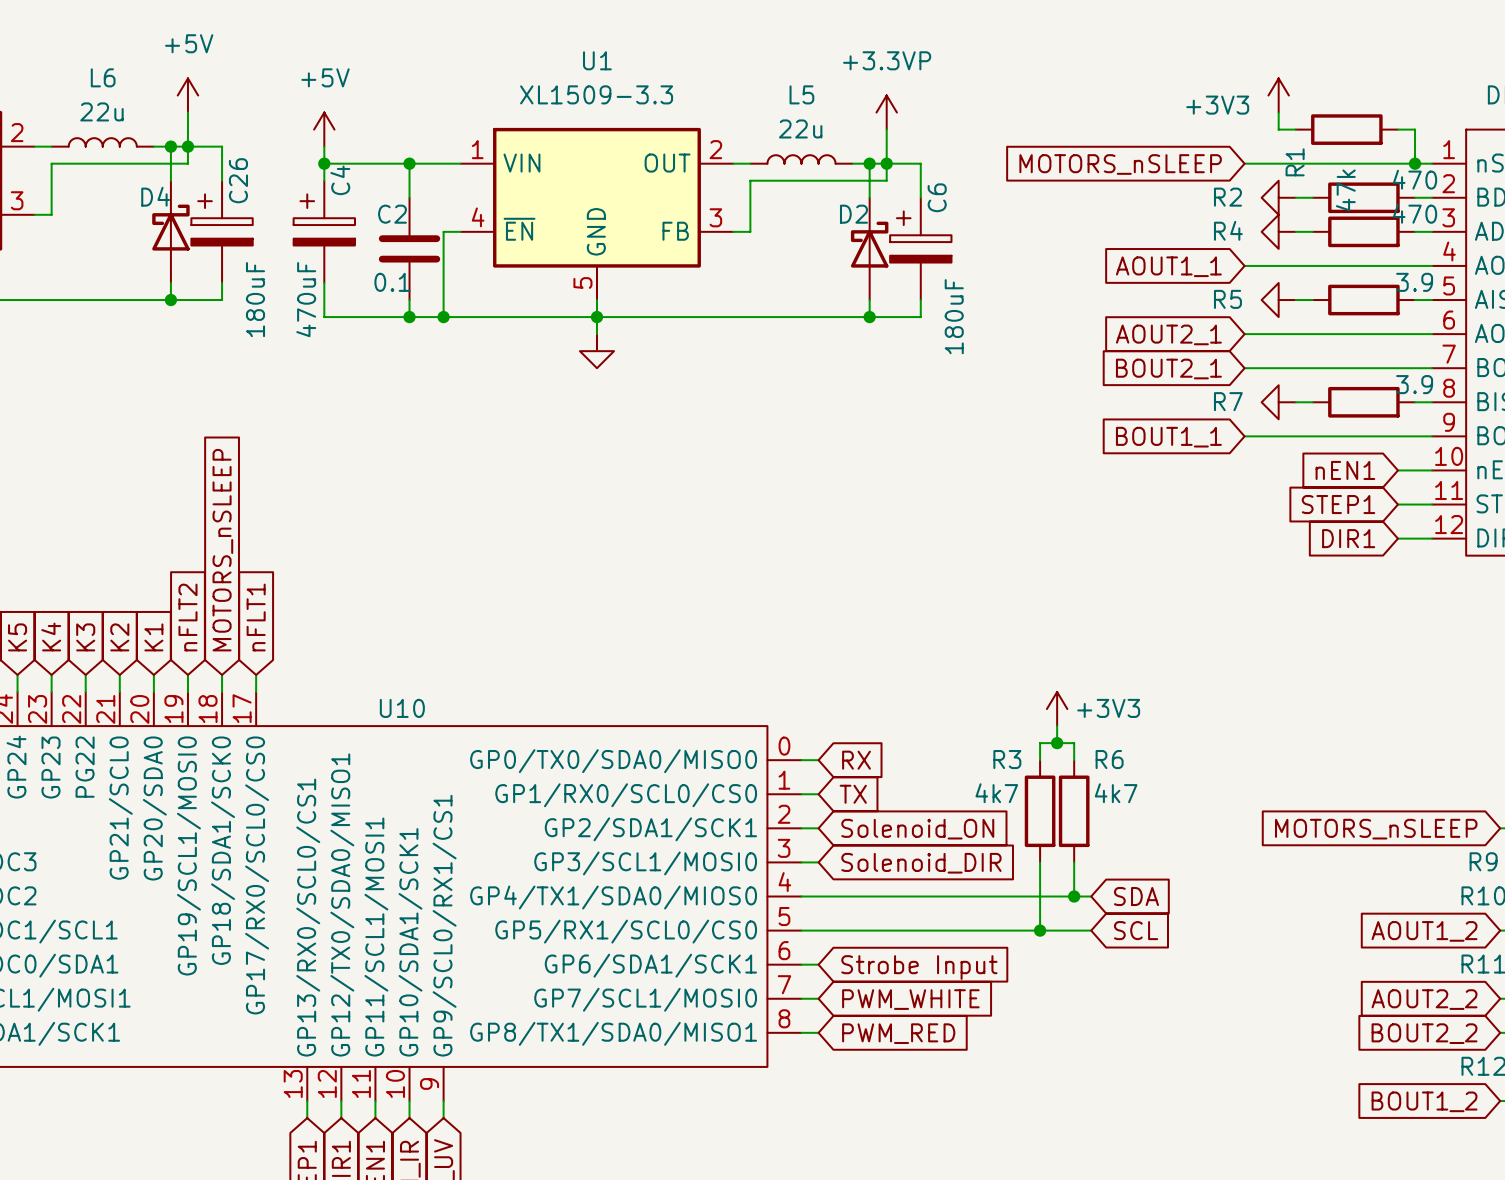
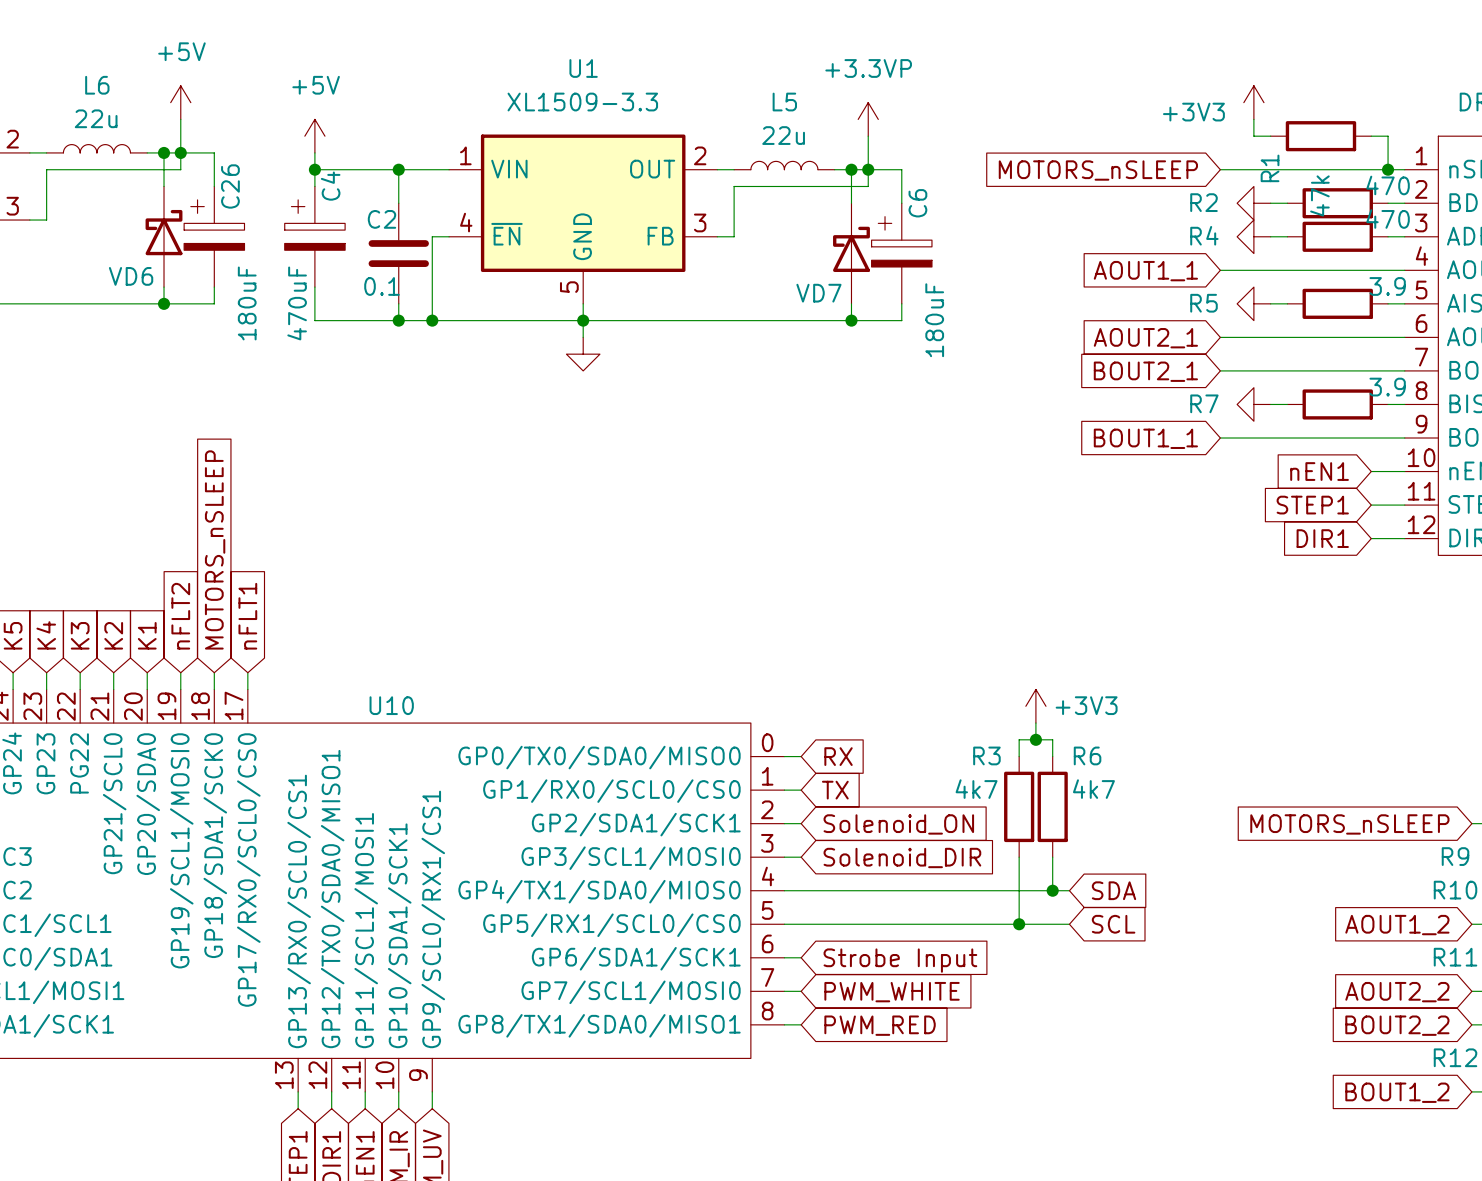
D4 name: D4 (155, 196) -> VD6 (131, 276)
D2 name: D2 (853, 214) -> VD7 (818, 293)

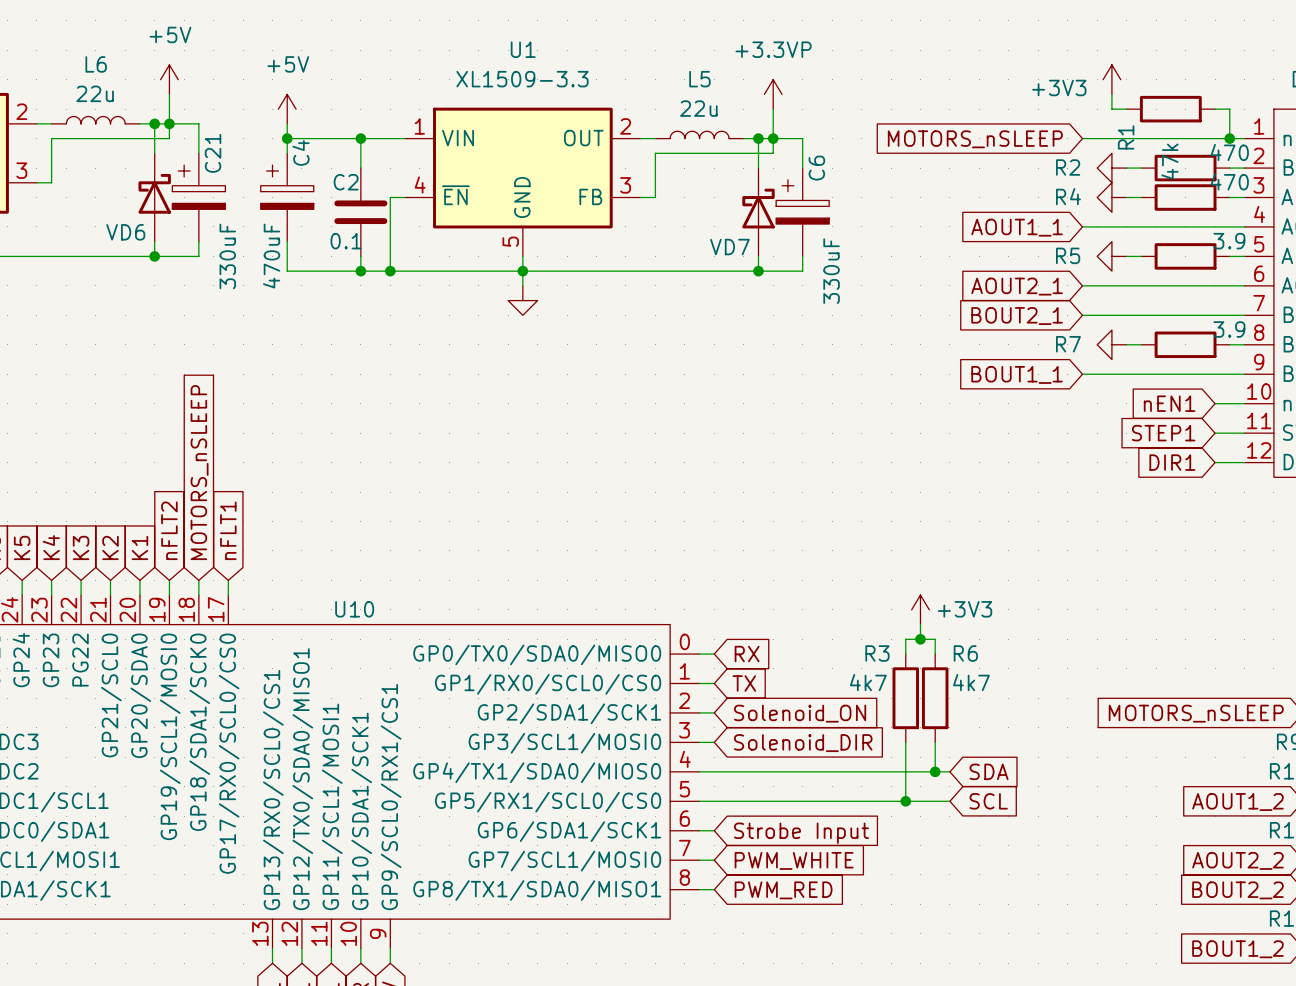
C26 name: C26 (230, 186) -> C21 (213, 153)
C26 value: 180uF (247, 303) -> 330uF (227, 256)
C6 value: 180uF (934, 320) -> 330uF (831, 271)

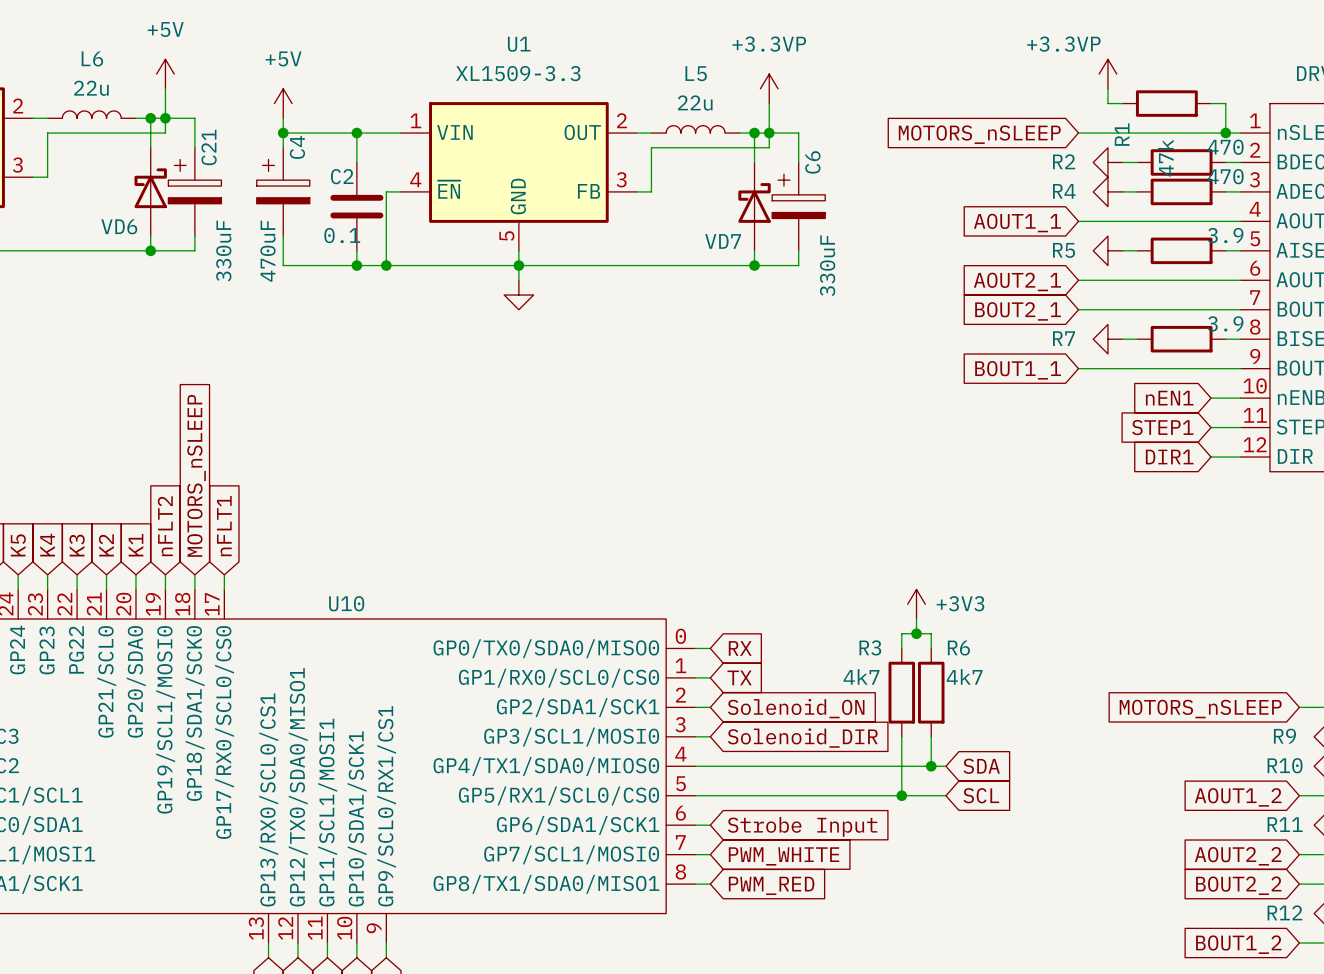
power symbol: +3V3 (1111, 79) -> +3.3VP (1107, 74)

